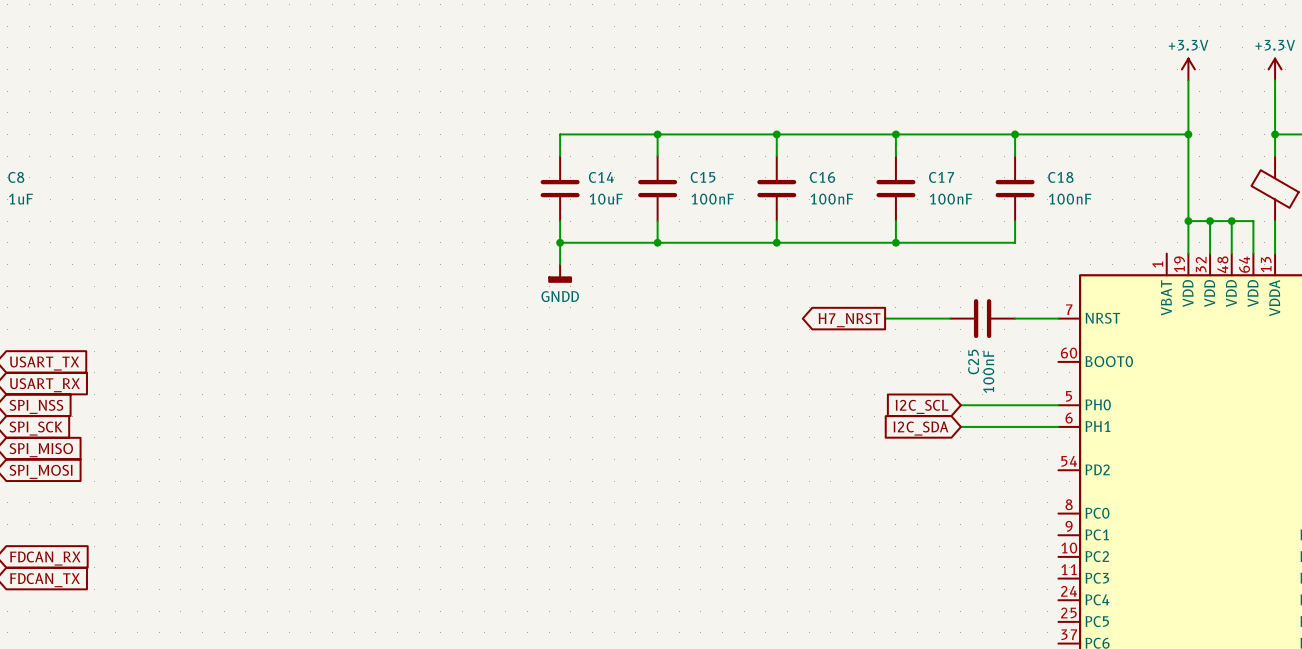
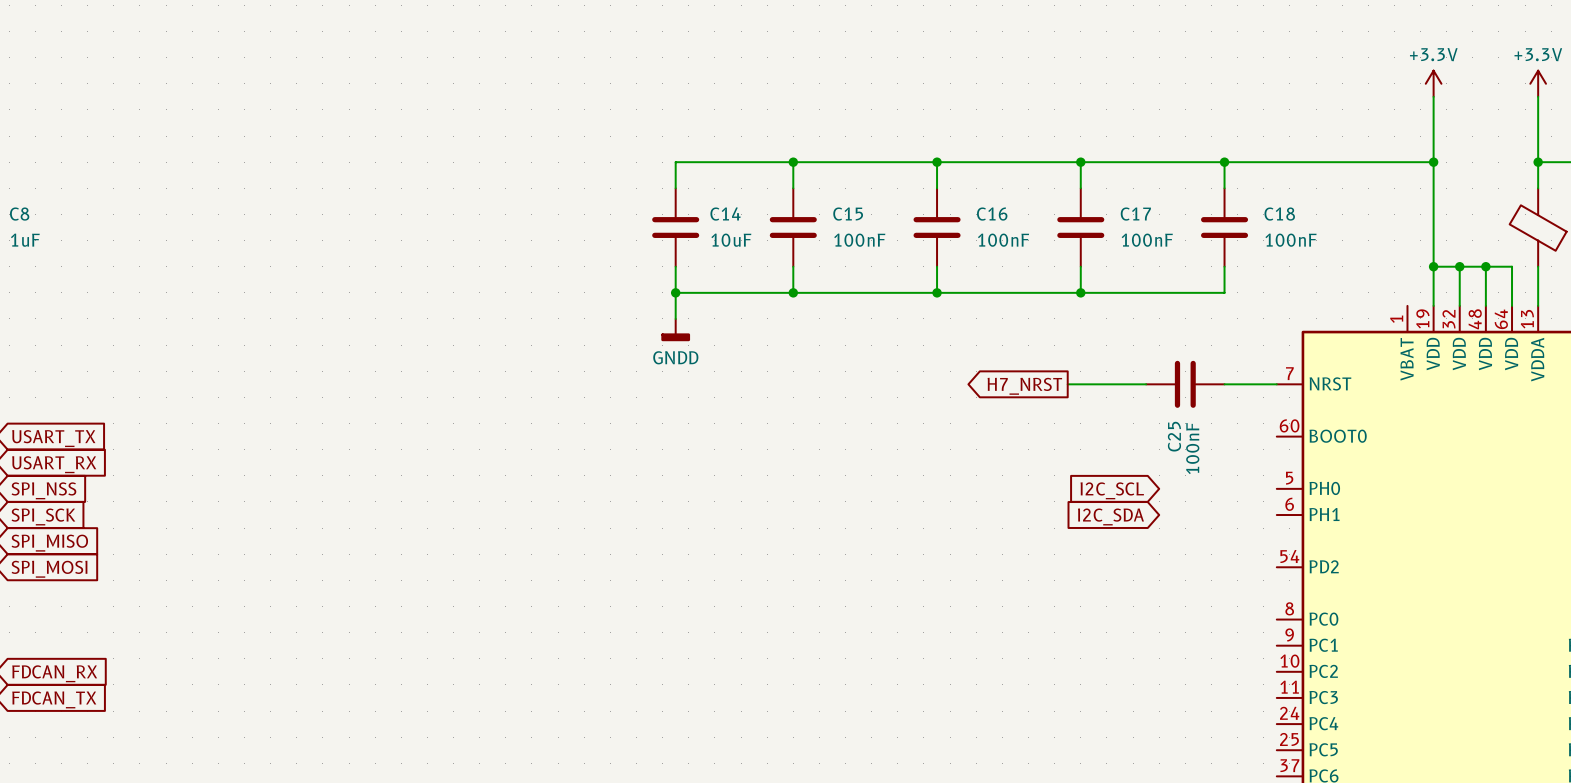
wire: (960, 405) (1058, 405) -> none
wire: (960, 426) (1058, 426) -> none

